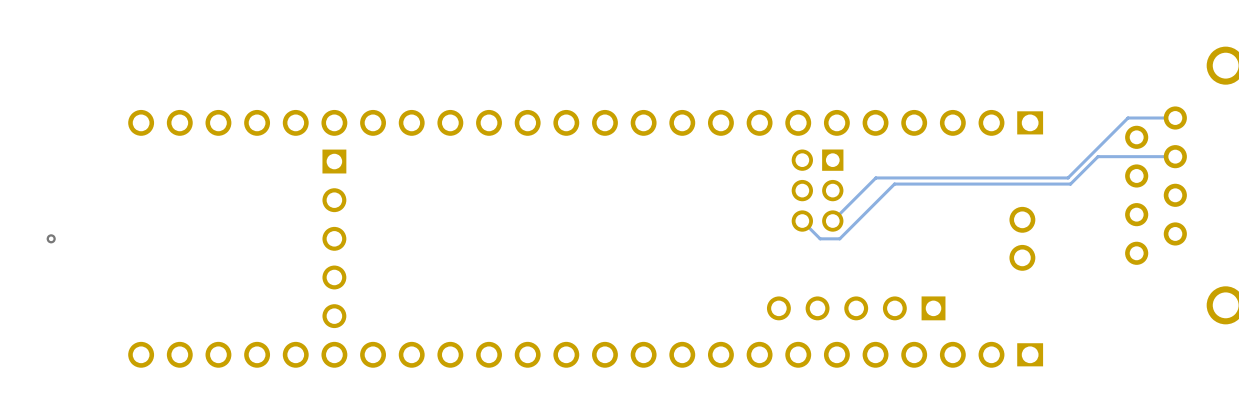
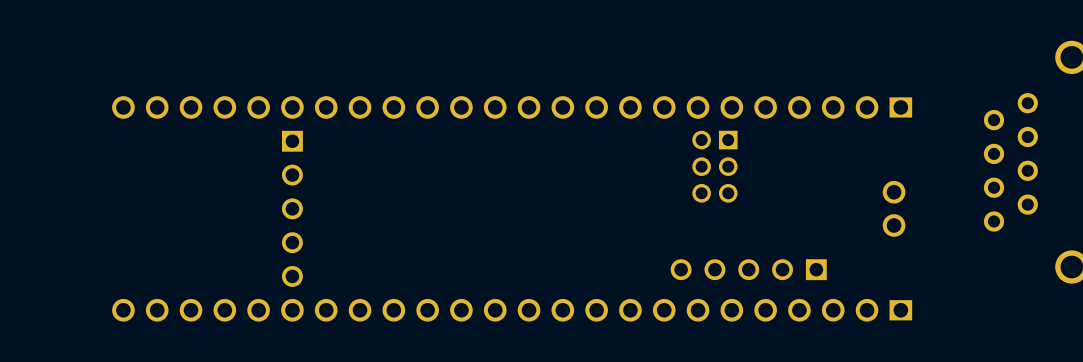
track: (1175, 118) (1128, 118) (1068, 177) (875, 177) (832, 221) -> none
track: (1175, 156) (1097, 156) (1070, 184) (894, 184) (839, 238) (820, 238) (802, 221) -> none
via: (51, 238) -> none

